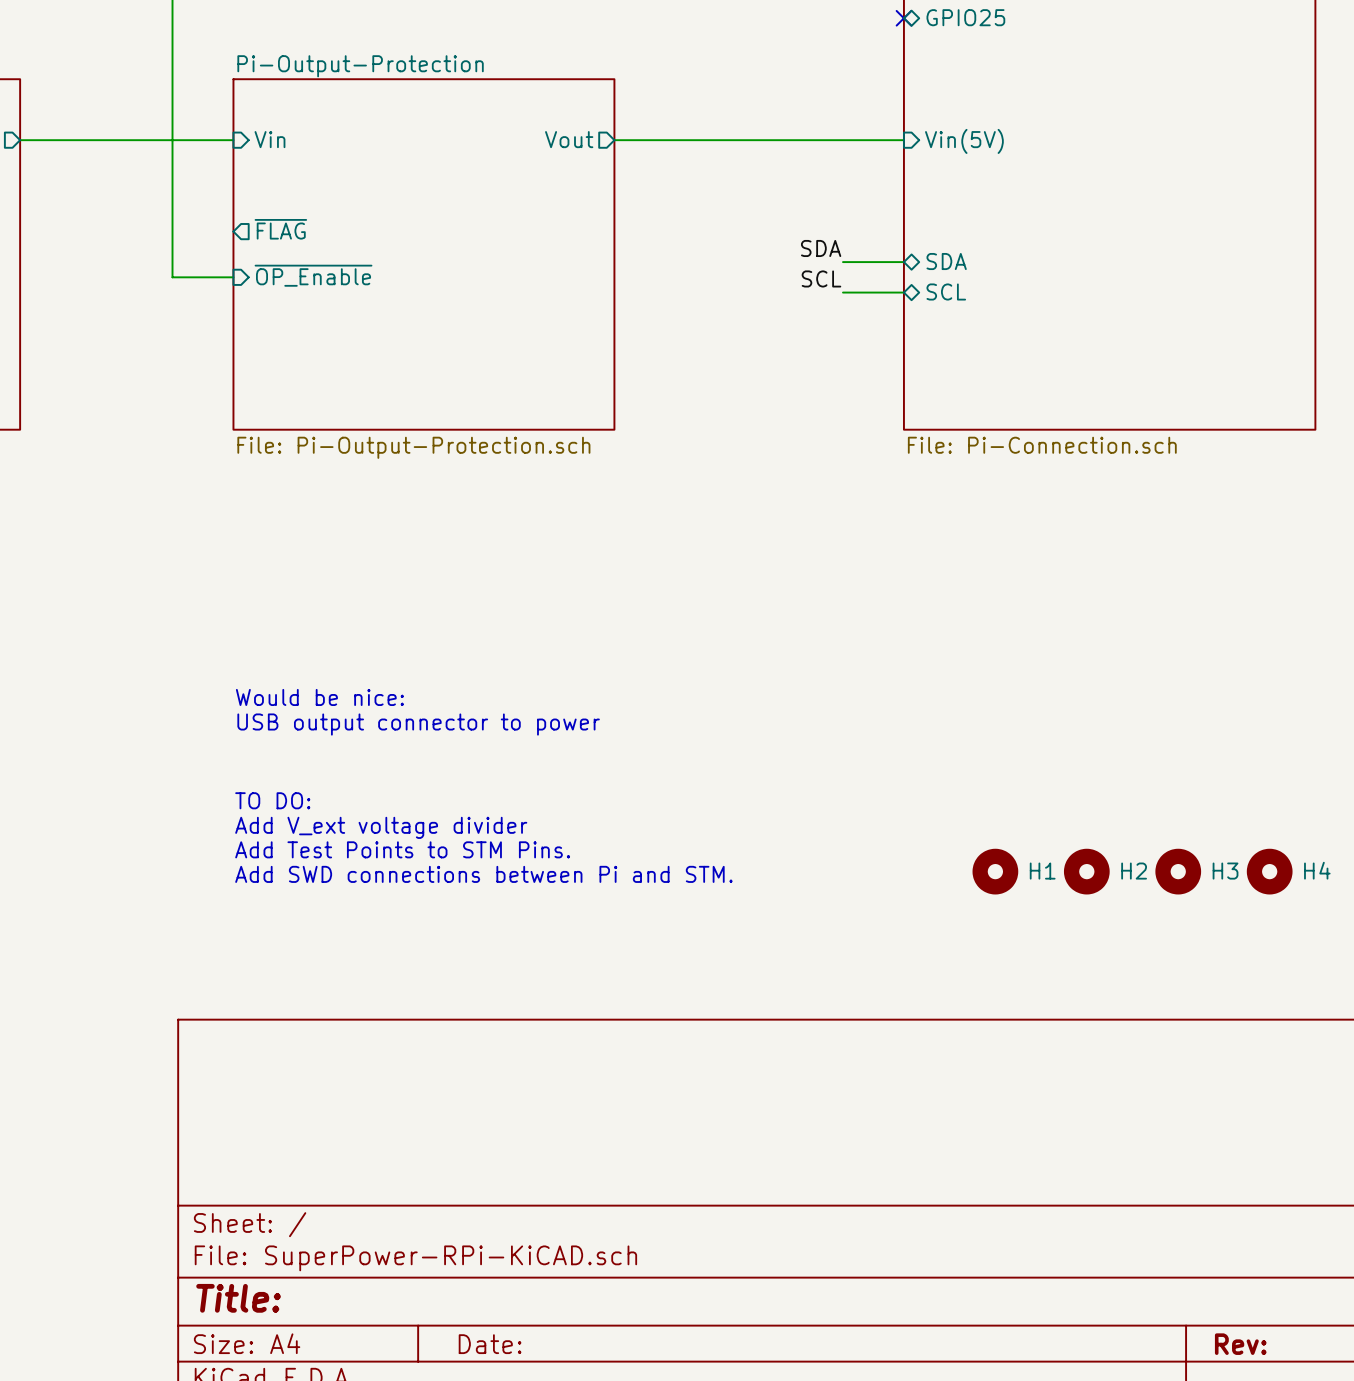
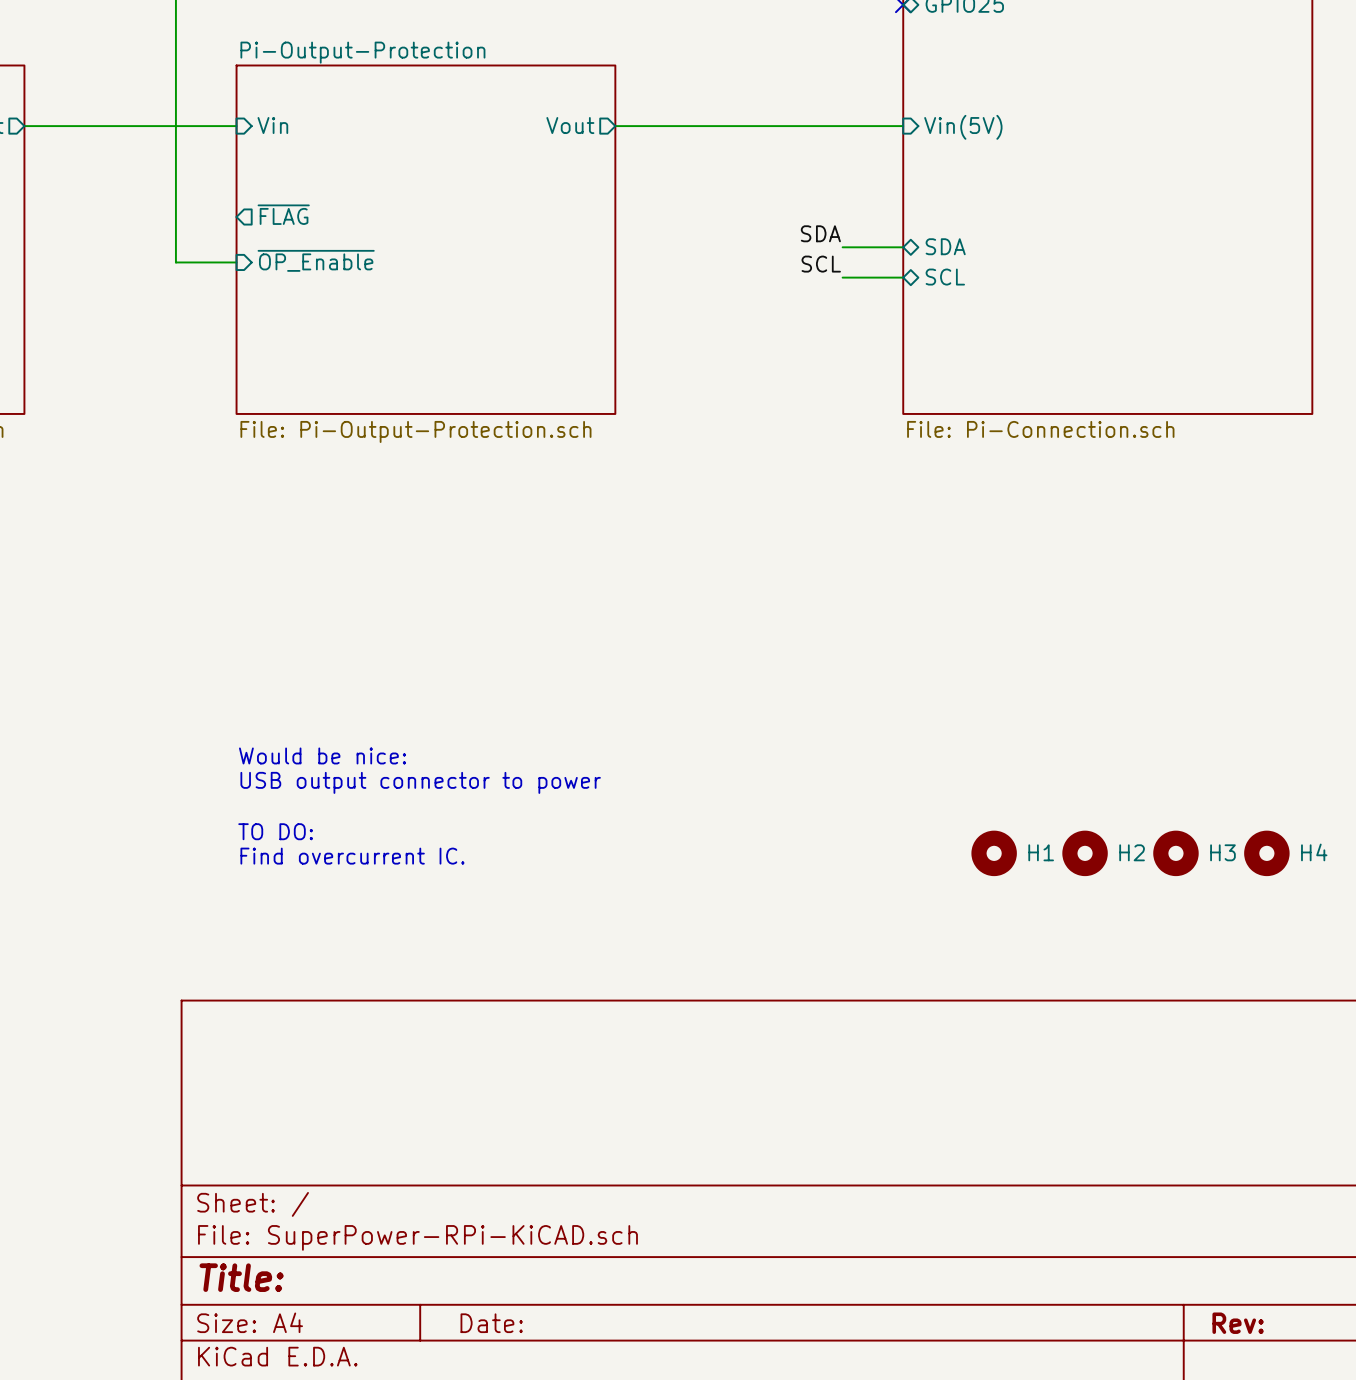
text position: Would be nice: (319, 697) -> Would be nice: (322, 755)
text: USB output connector to power (418, 724) -> none
text: TO DO: (272, 800) -> USB output connector to power (420, 782)
text: Add V_ext voltage divider (381, 827) -> none
text: Add Test Points to STM Pins. (402, 849) -> TO DO: (275, 831)
text: Add SWD connections between Pi and STM. (483, 874) -> Find overcurrent IC. (352, 856)

